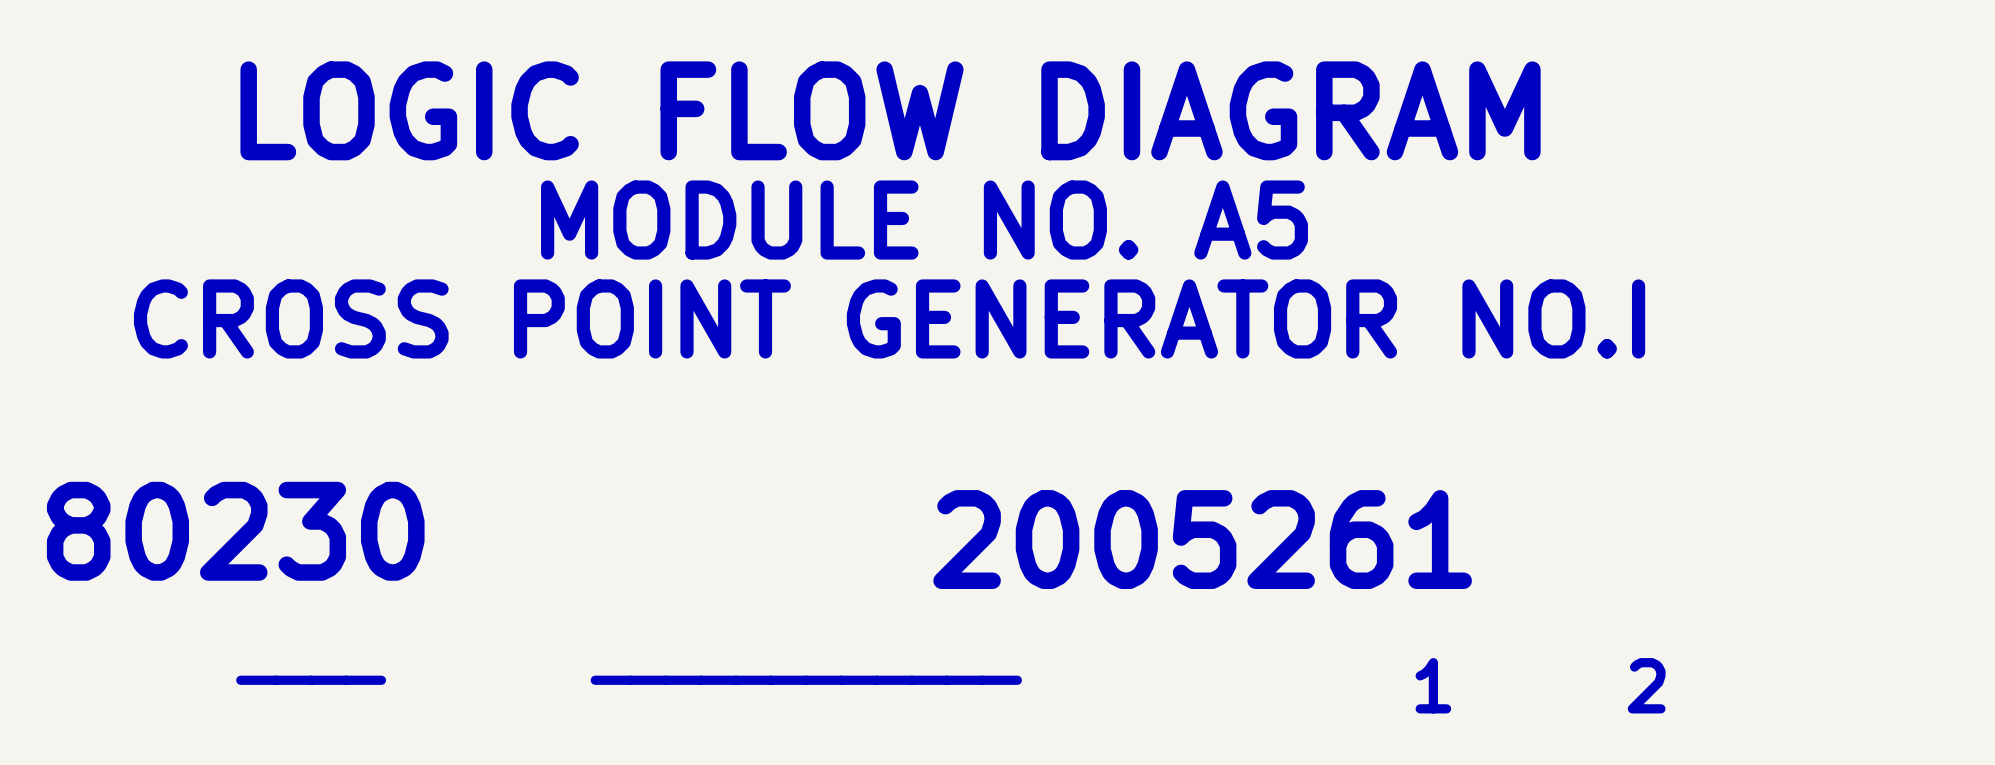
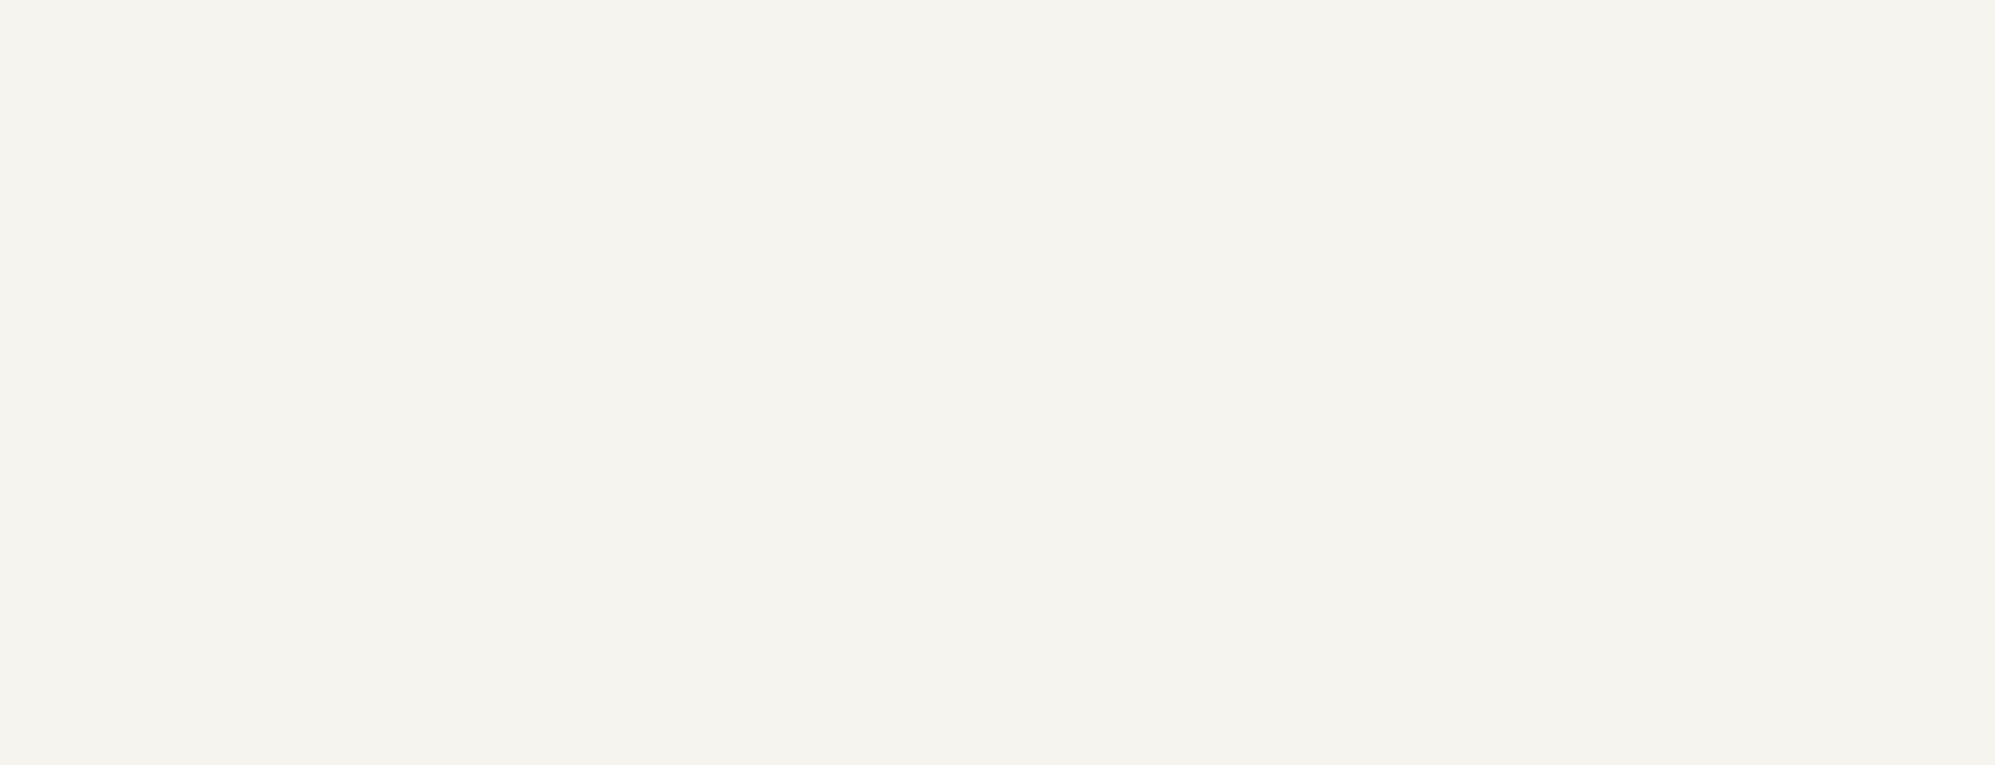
text: LOGIC FLOW DIAGRAM (890, 110) -> none
text: MODULE NO. A5 (924, 220) -> none
text: CROSS POINT GENERATOR NO.I (889, 318) -> none
text: 80230 (235, 531) -> none
text: 2005261 (1202, 539) -> none
text: ____ (311, 680) -> none
text: ____________ (806, 680) -> none
text: 1 (1433, 685) -> none
text: 2 (1646, 685) -> none

